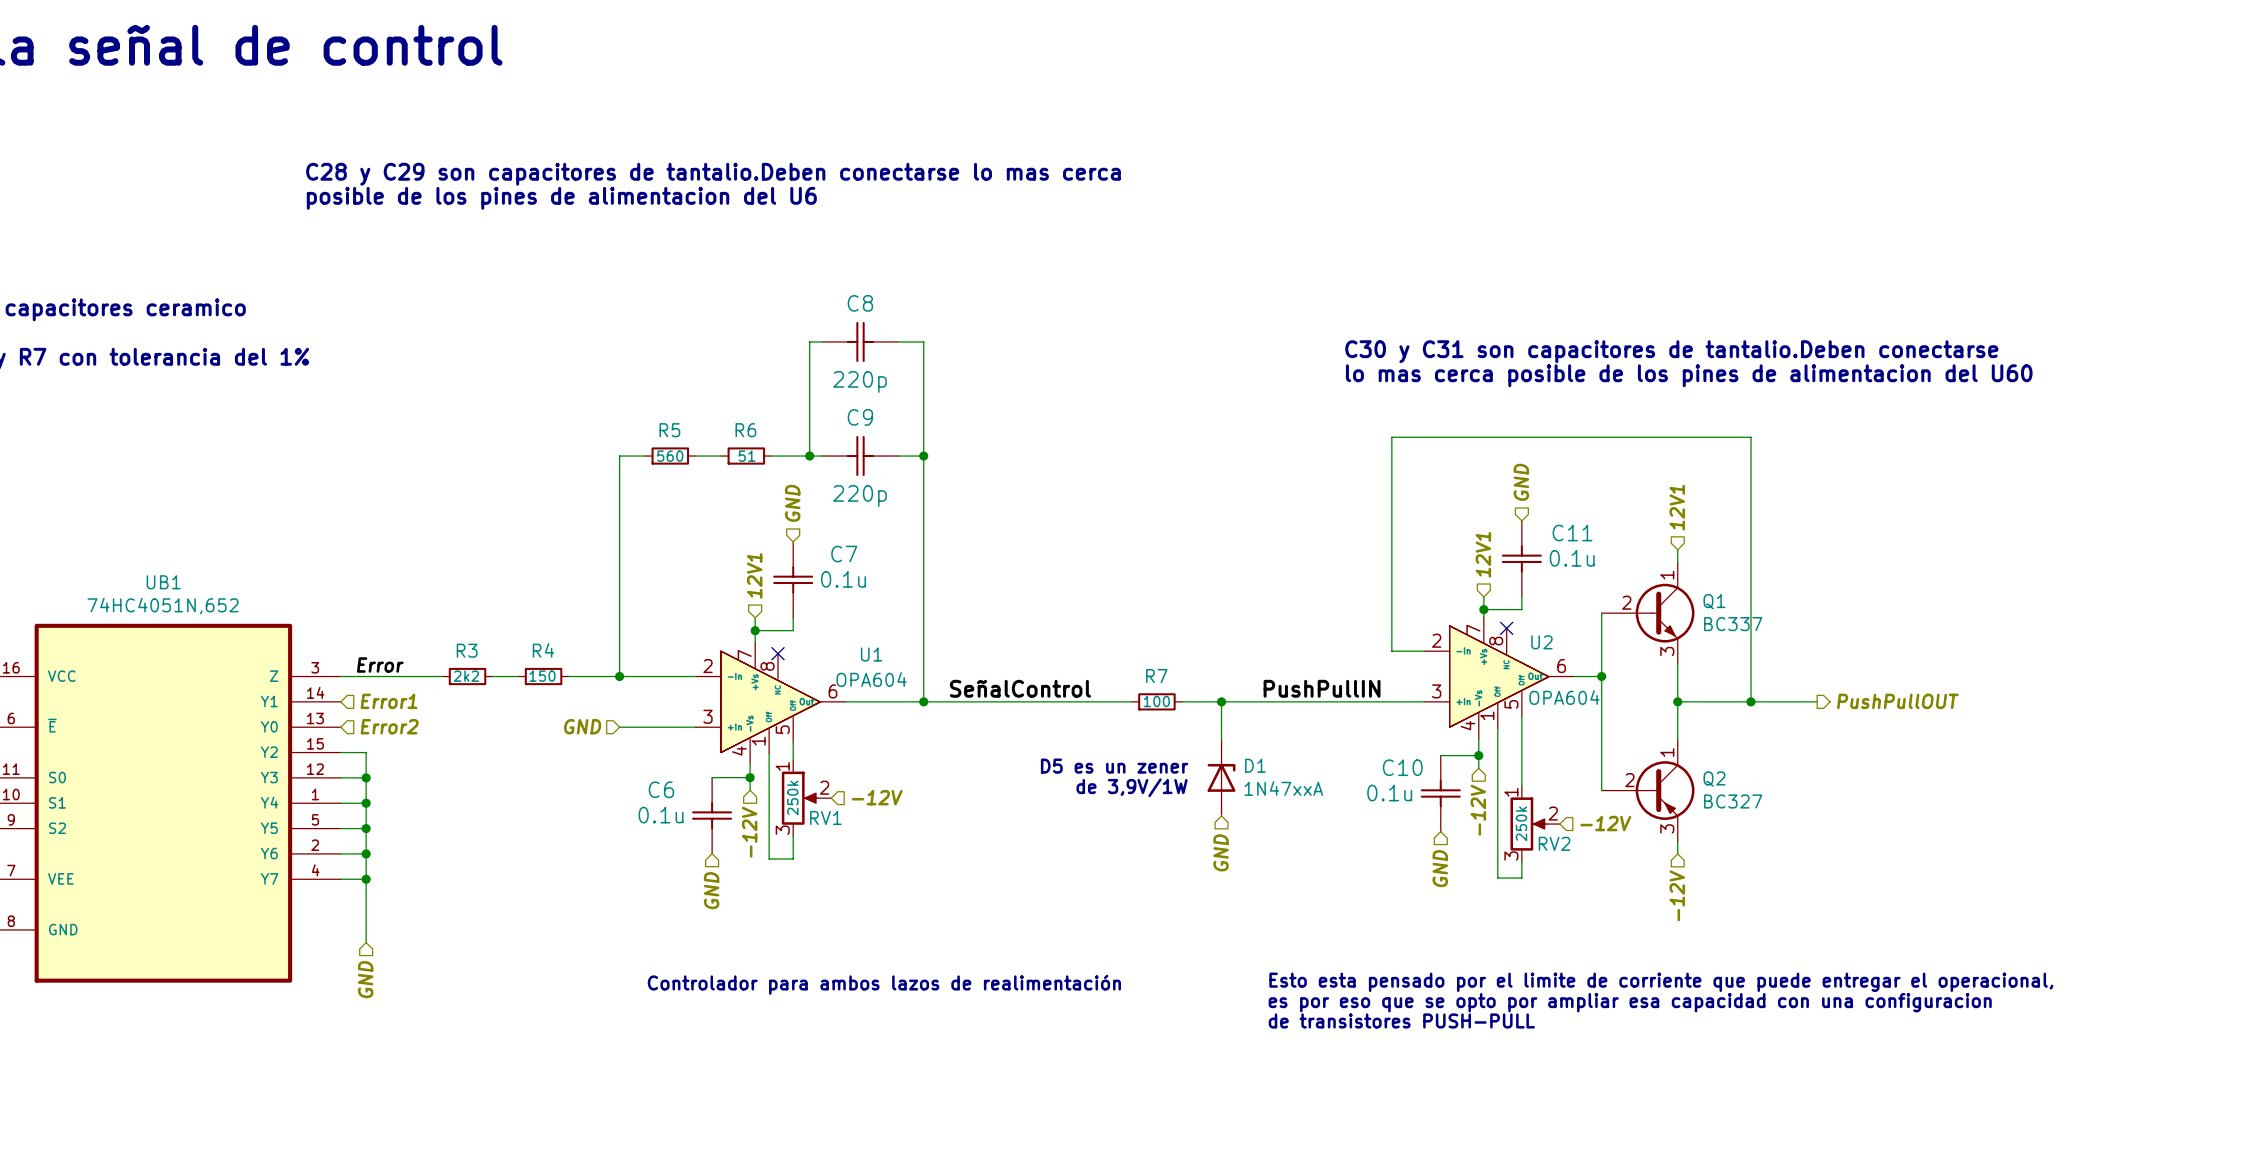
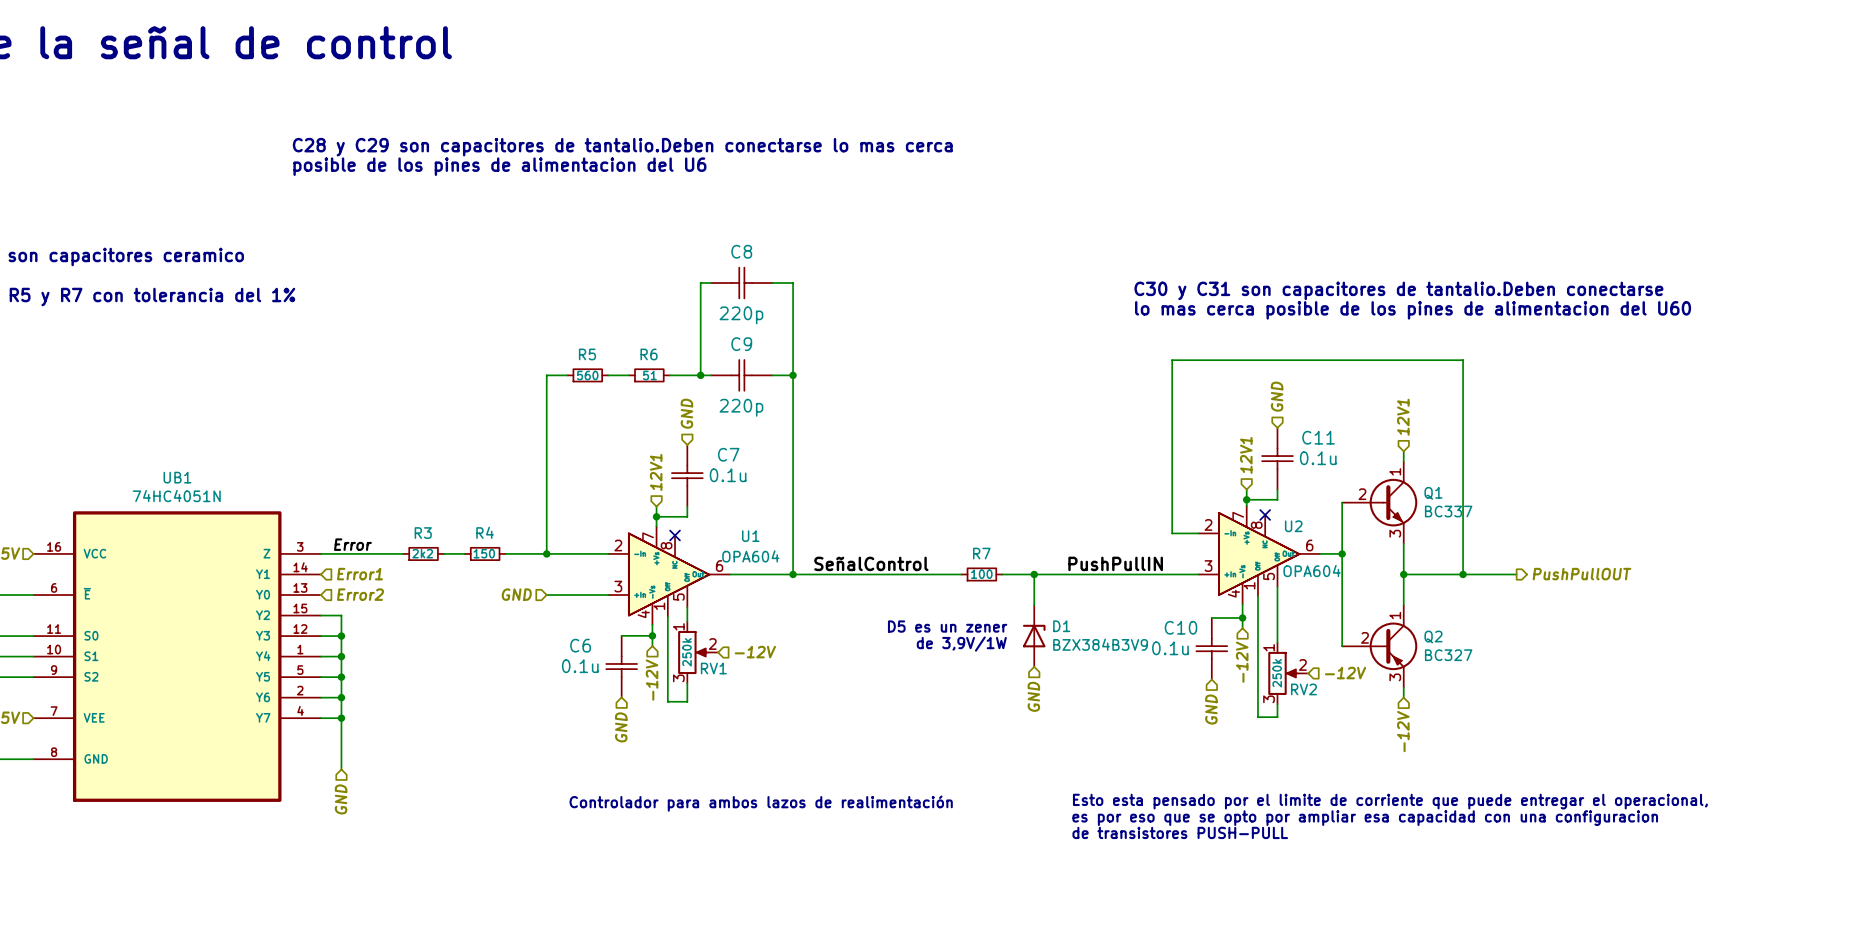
UB1 value: 74HC4051N,652 (163, 605) -> 74HC4051N (176, 496)
D1 value: 1N47xxA (1283, 788) -> BZX384B3V9 (1100, 644)

